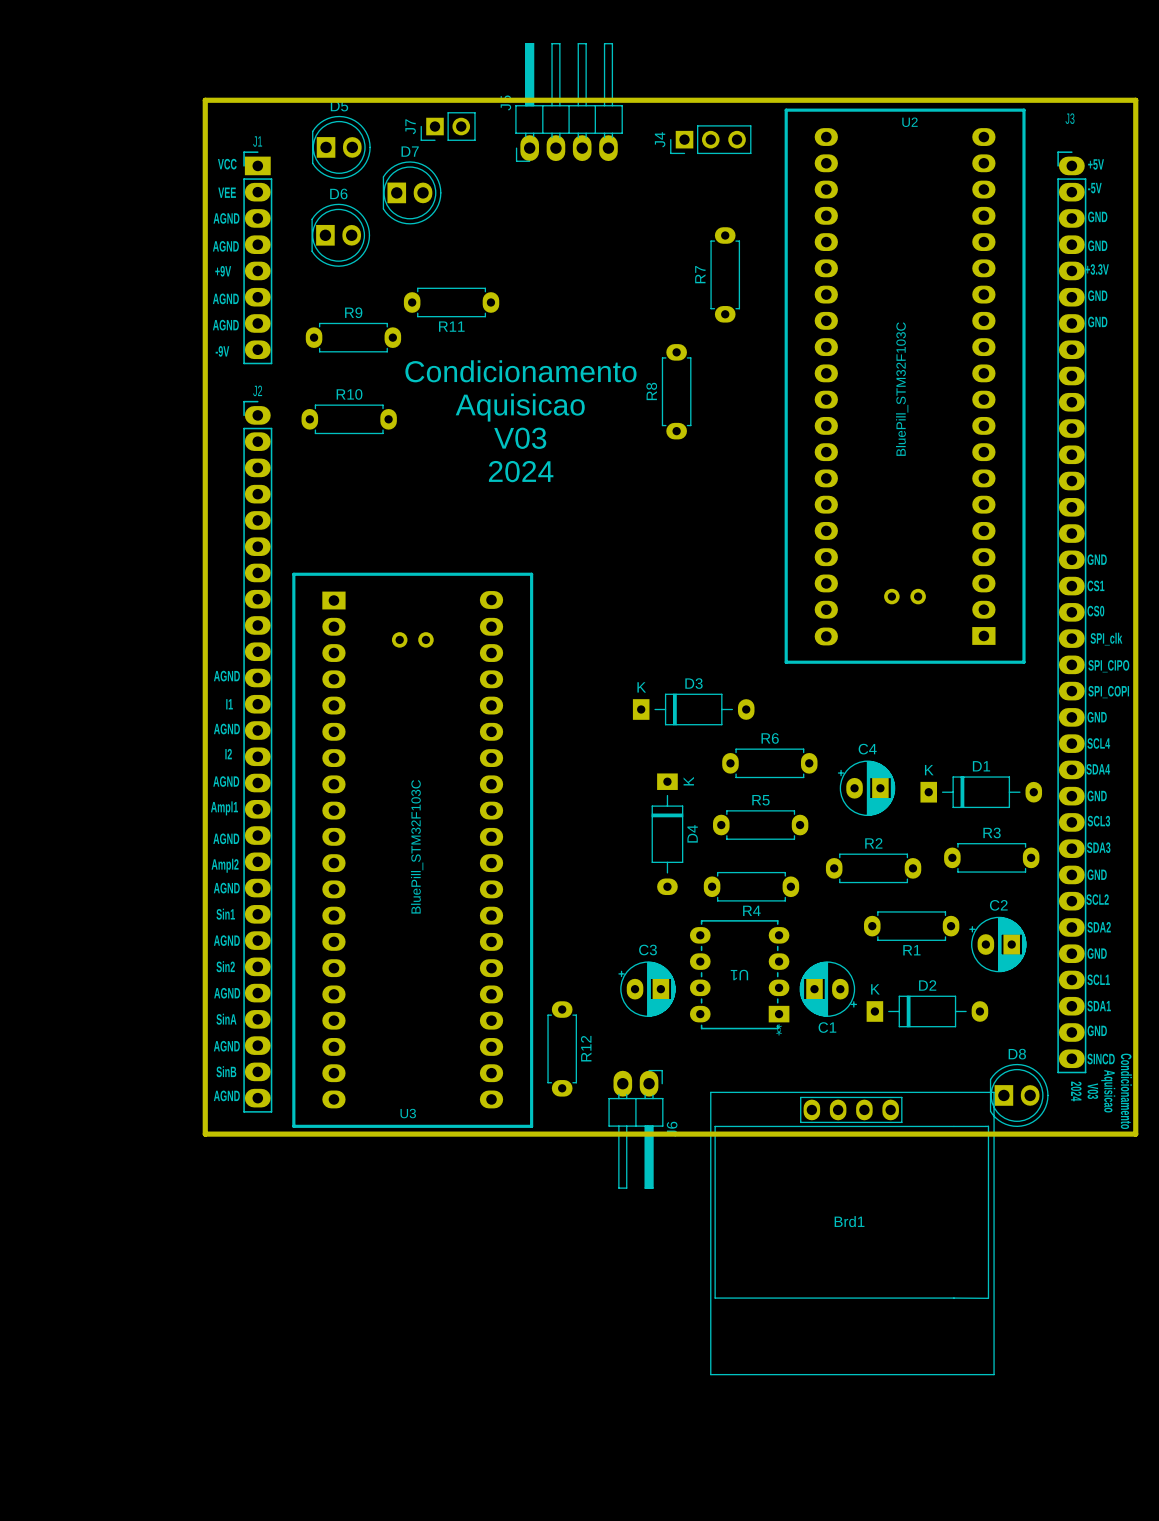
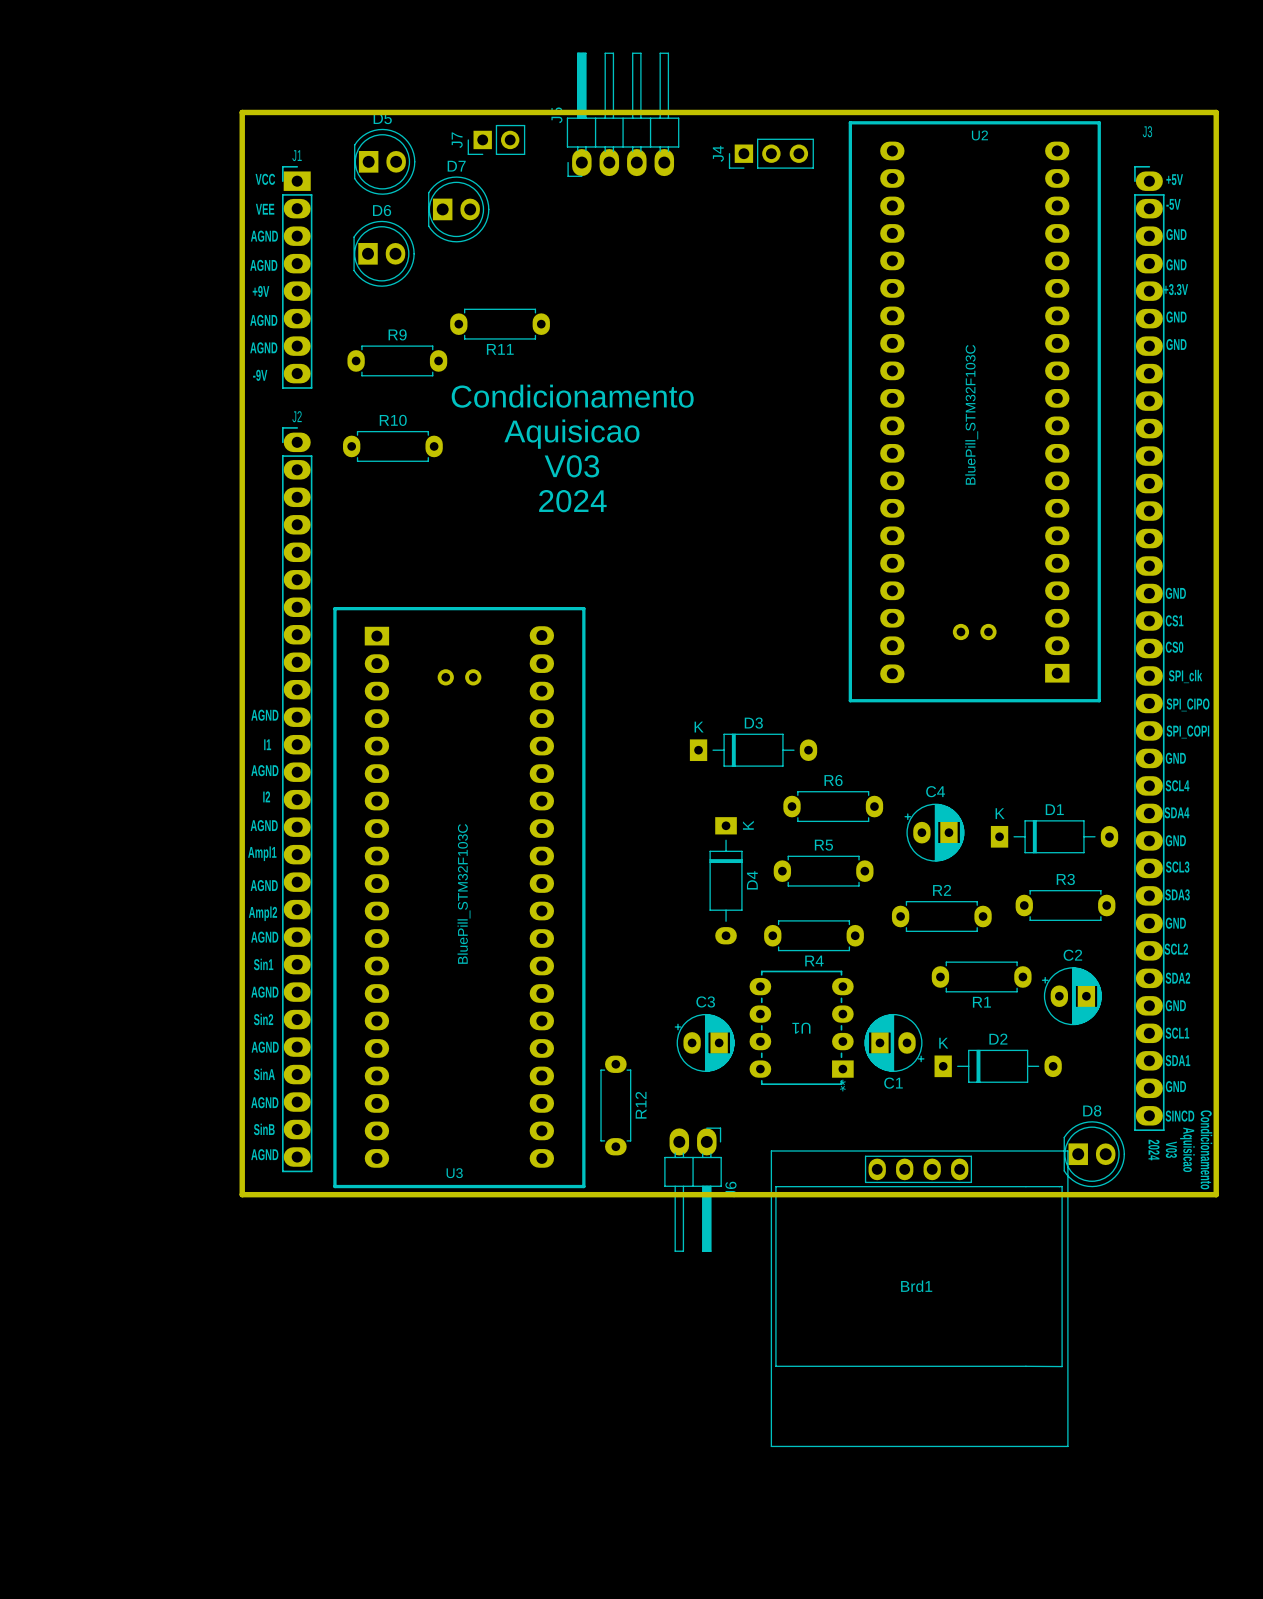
R7: (725, 274) -> none
R8: (676, 391) -> none

